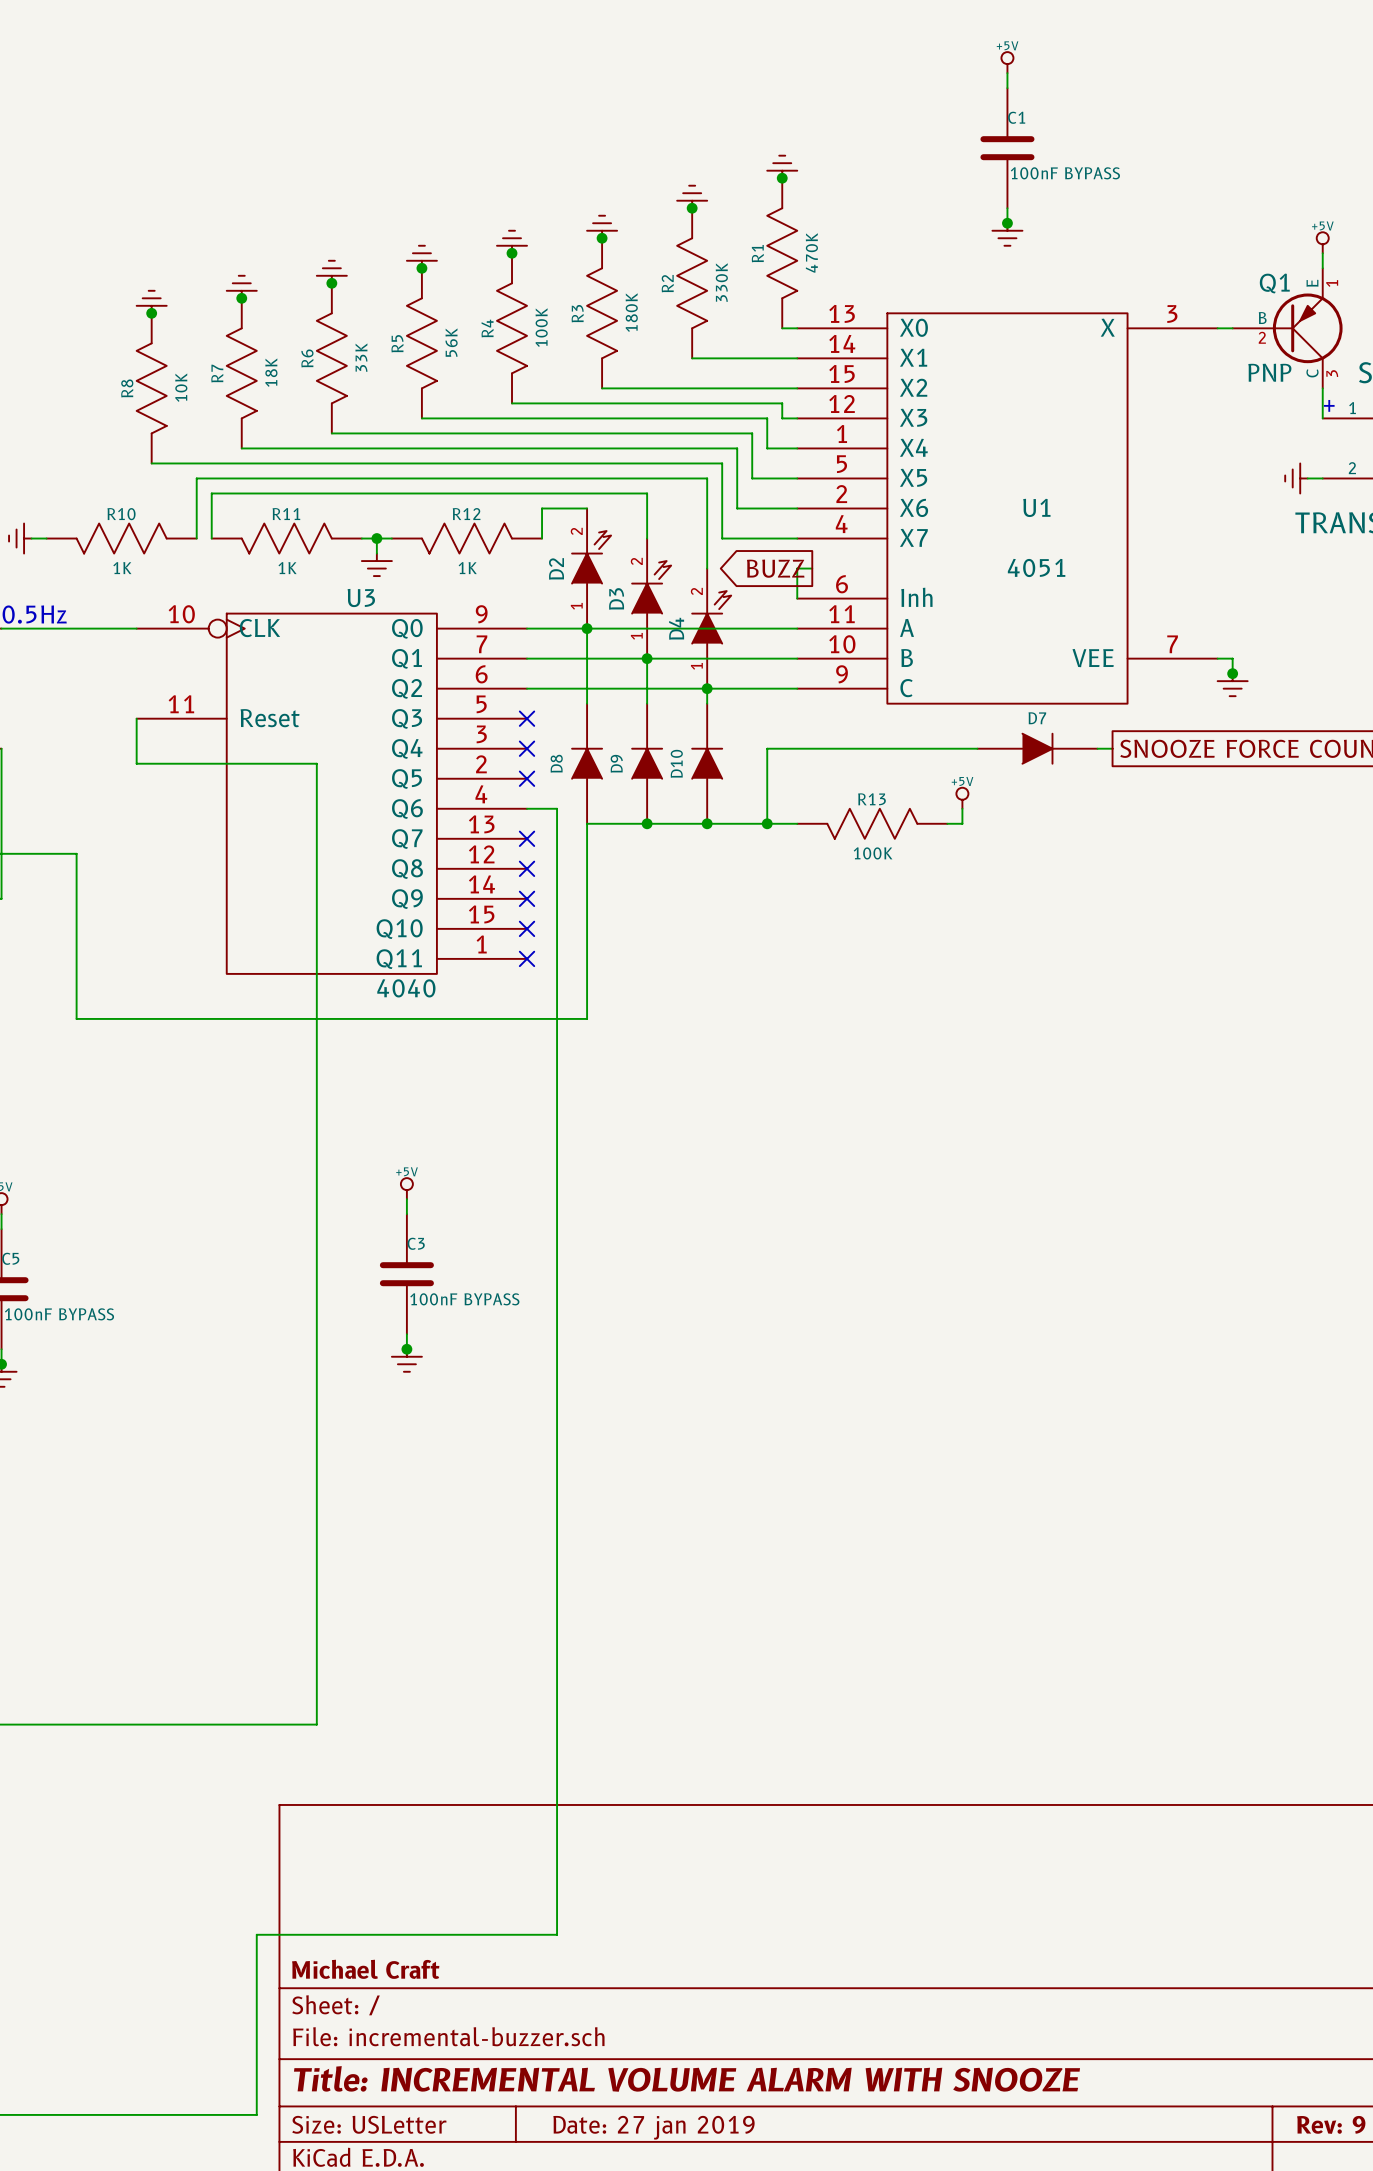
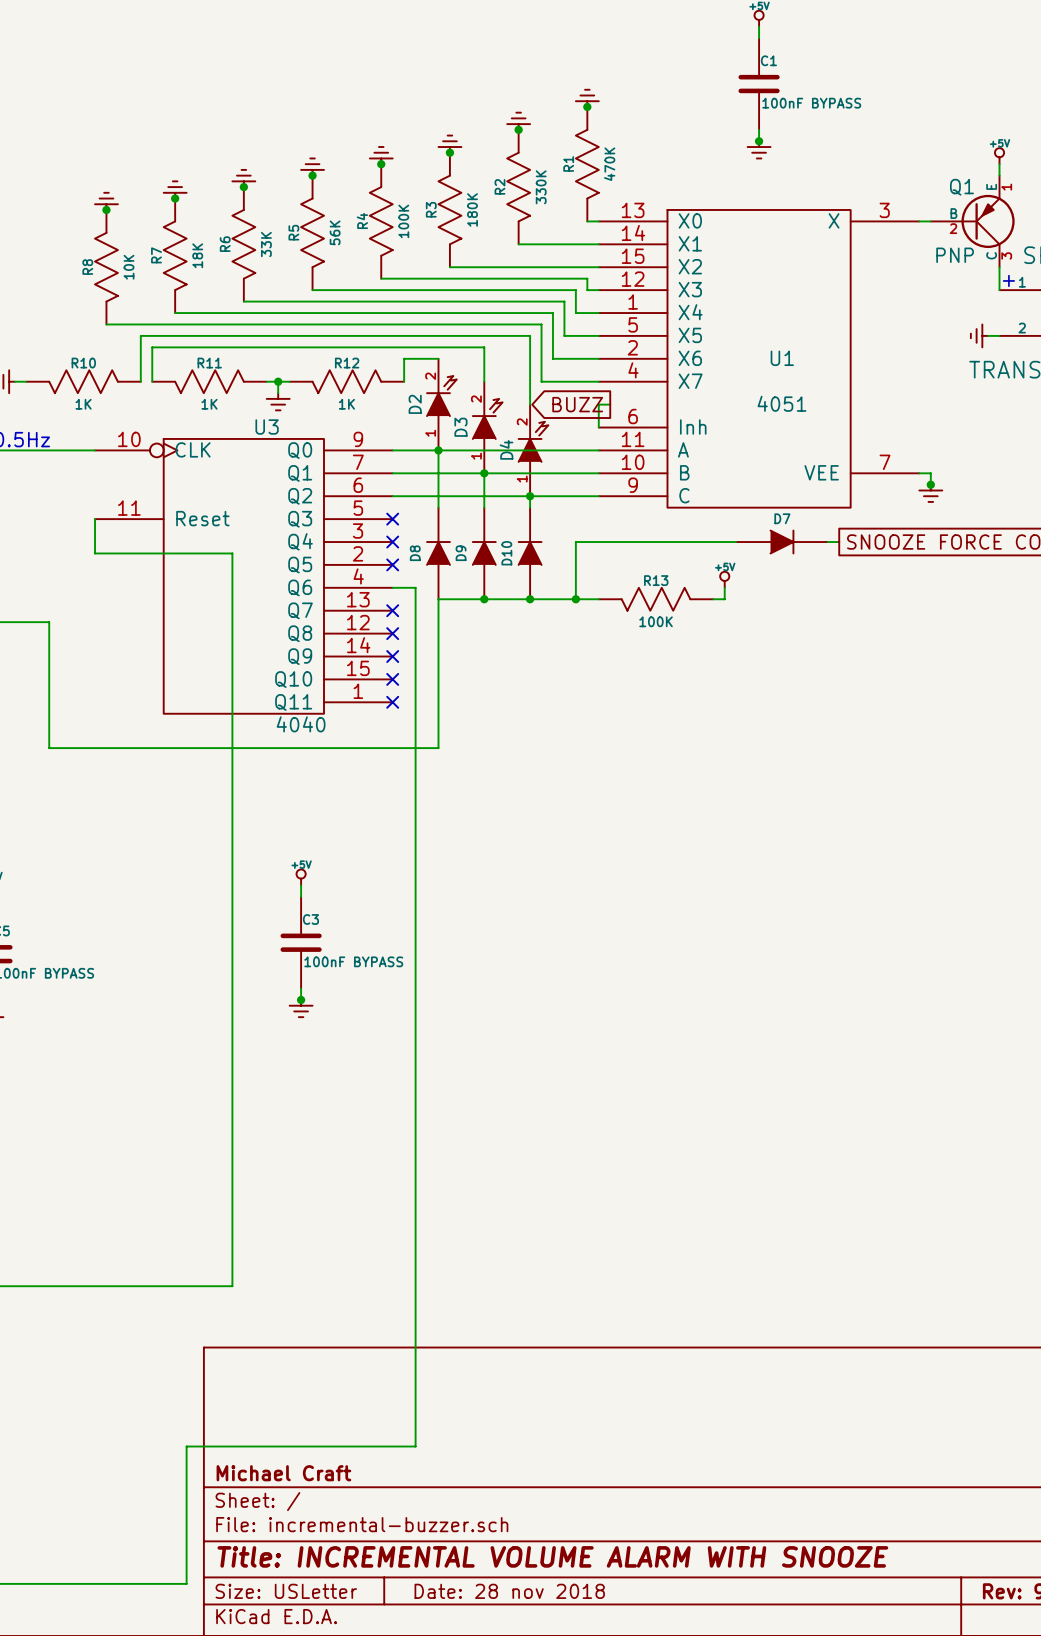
title block: Date: 27 jan 2019 (653, 2127) -> Date: 28 nov 2018 (509, 1591)

